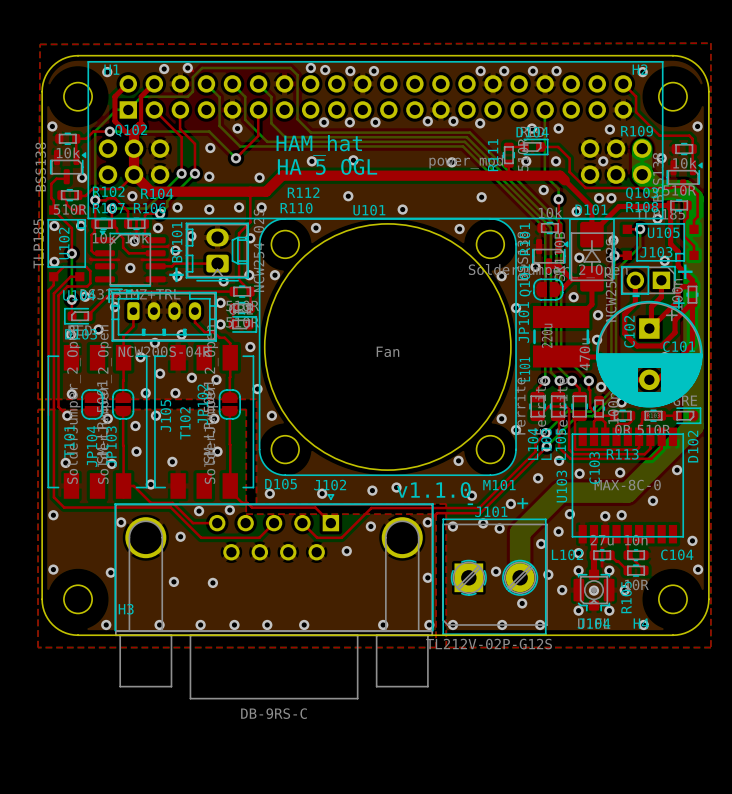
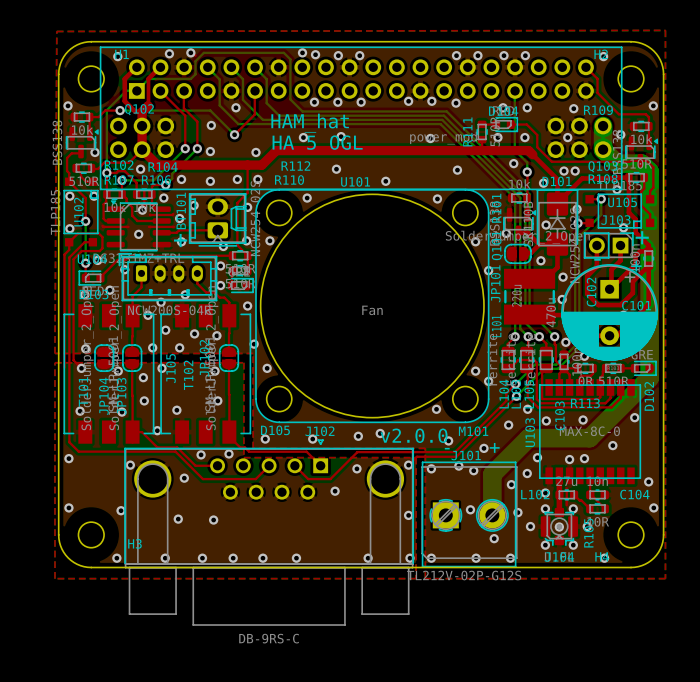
text: v1.1.0 (433, 490) -> v2.0.0 (414, 435)

